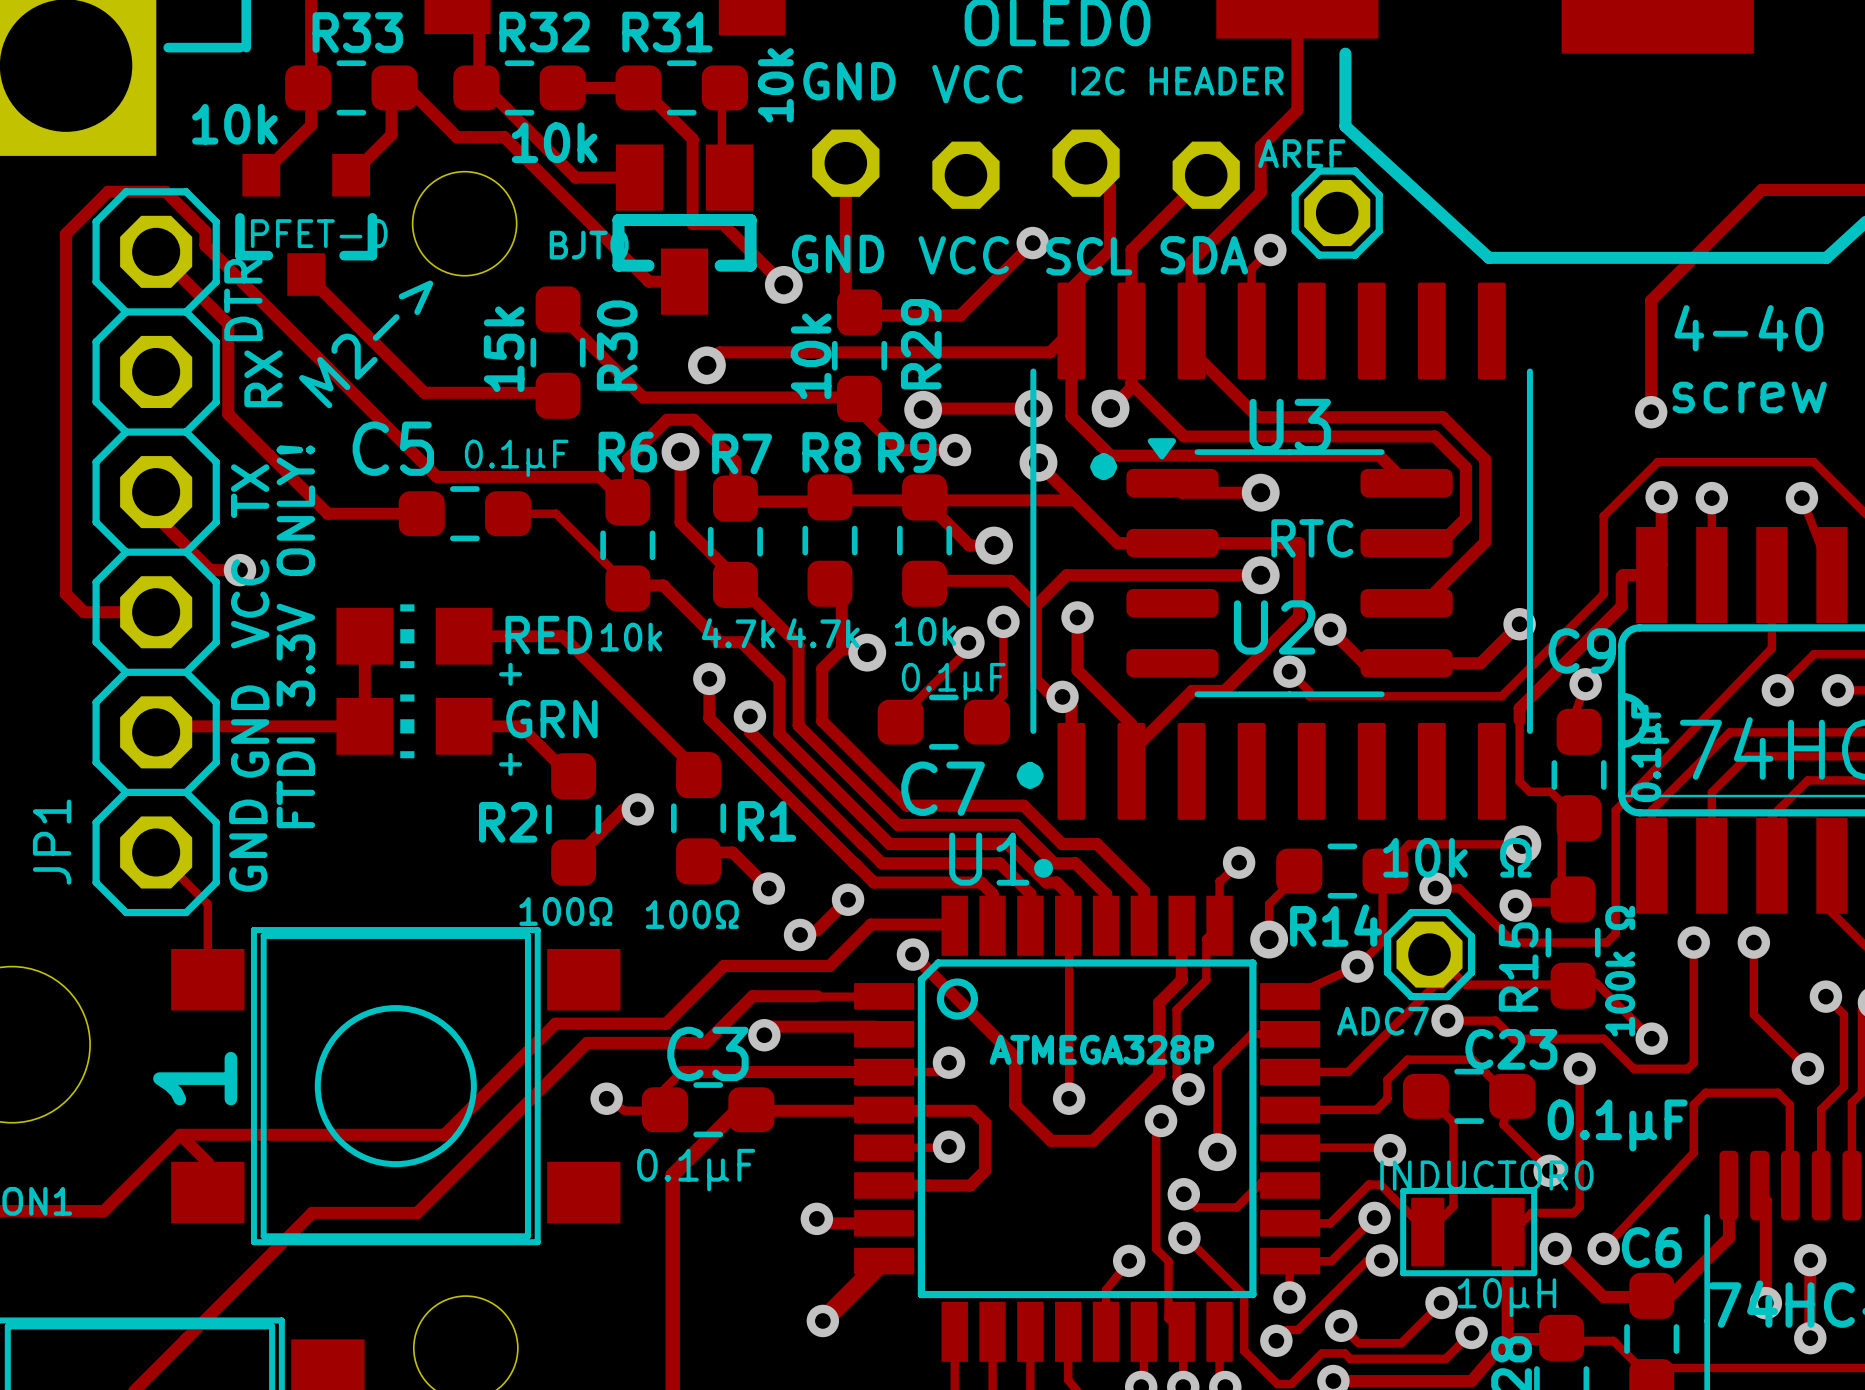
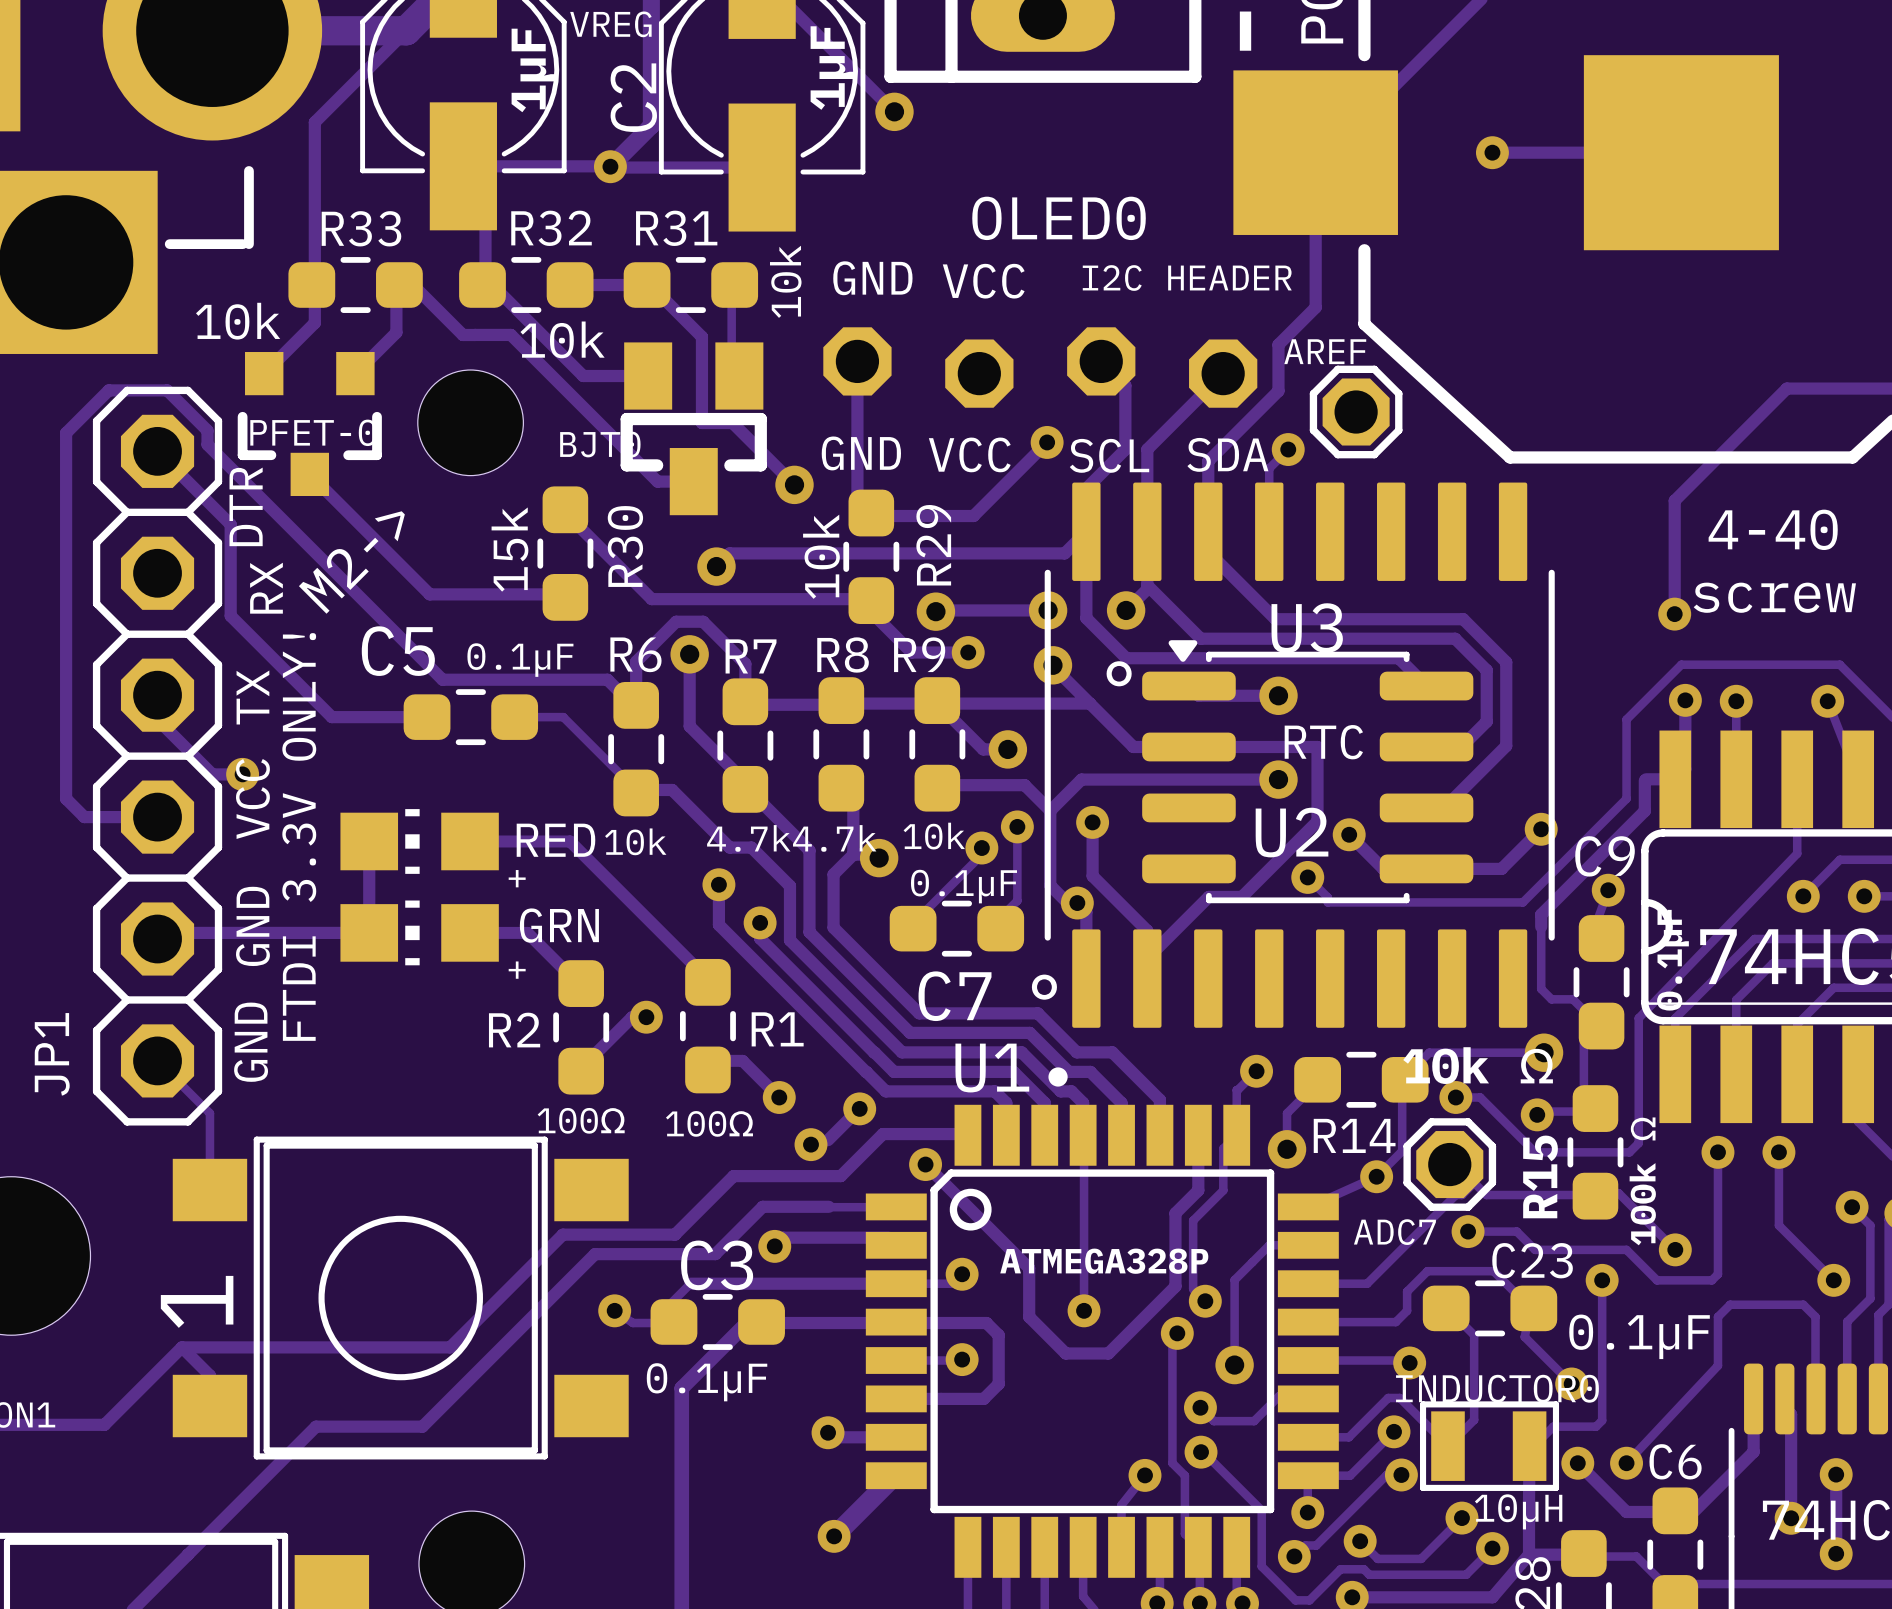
U3 footprint: [1126, 438, 1453, 698] -> [1142, 640, 1474, 904]

